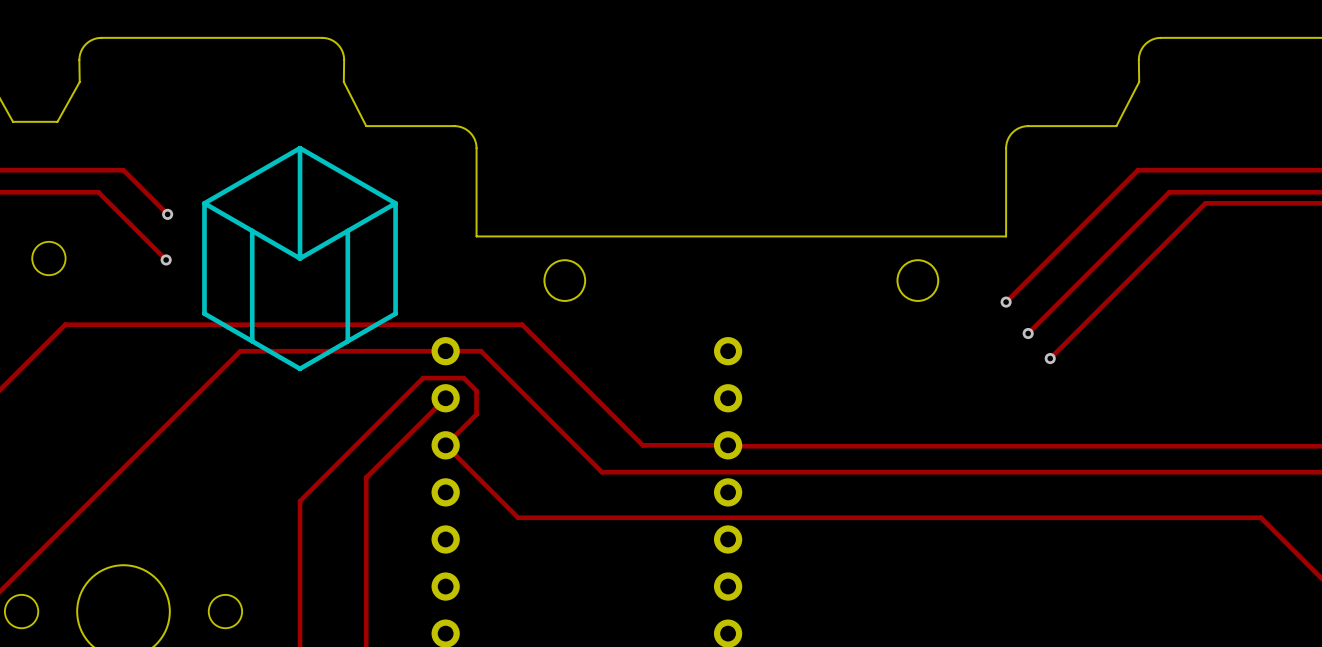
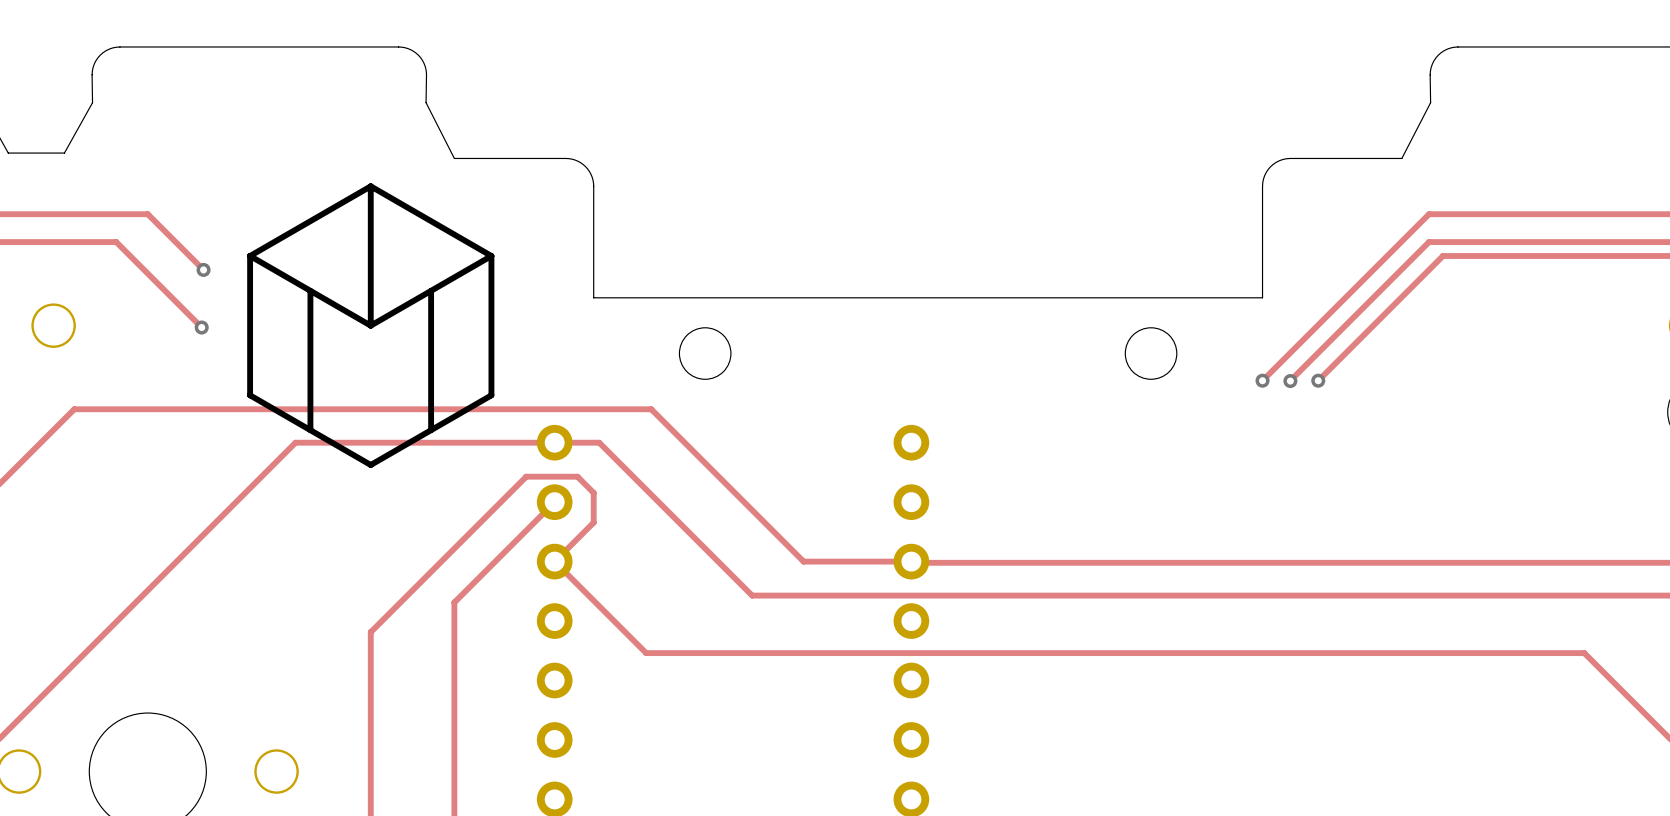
track: (1169, 192) (1028, 333) -> (1468, 242) (1429, 242) (1290, 380)
track: (1205, 203) (1050, 358) -> (1514, 256) (1442, 256) (1318, 380)
via: none -> (1290, 381)
via: none -> (1318, 380)
via: (1028, 333) -> none
via: (1050, 358) -> none

